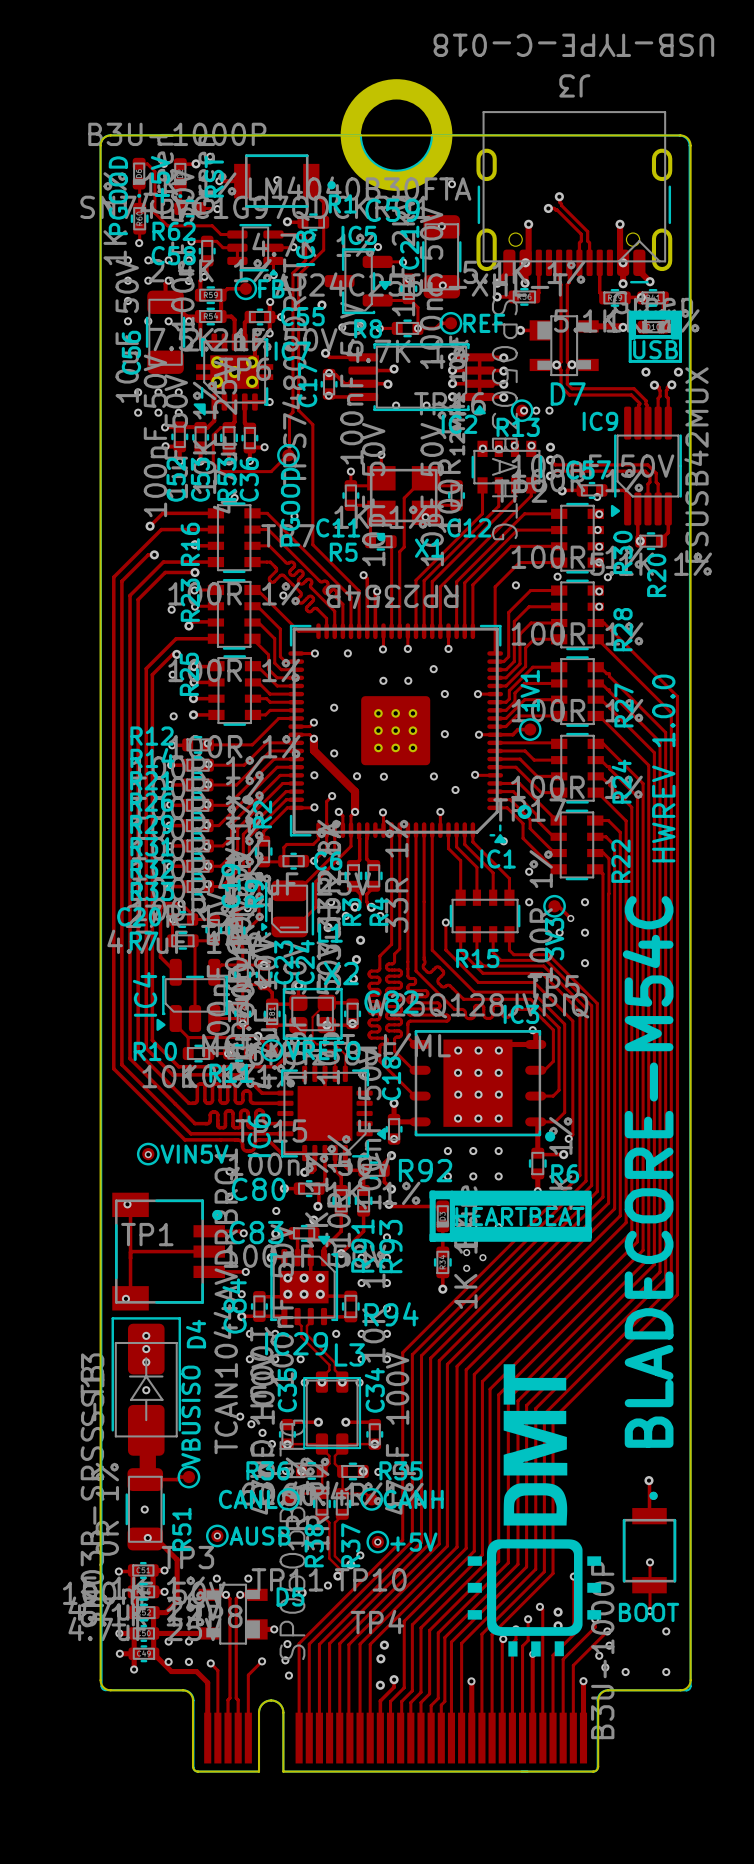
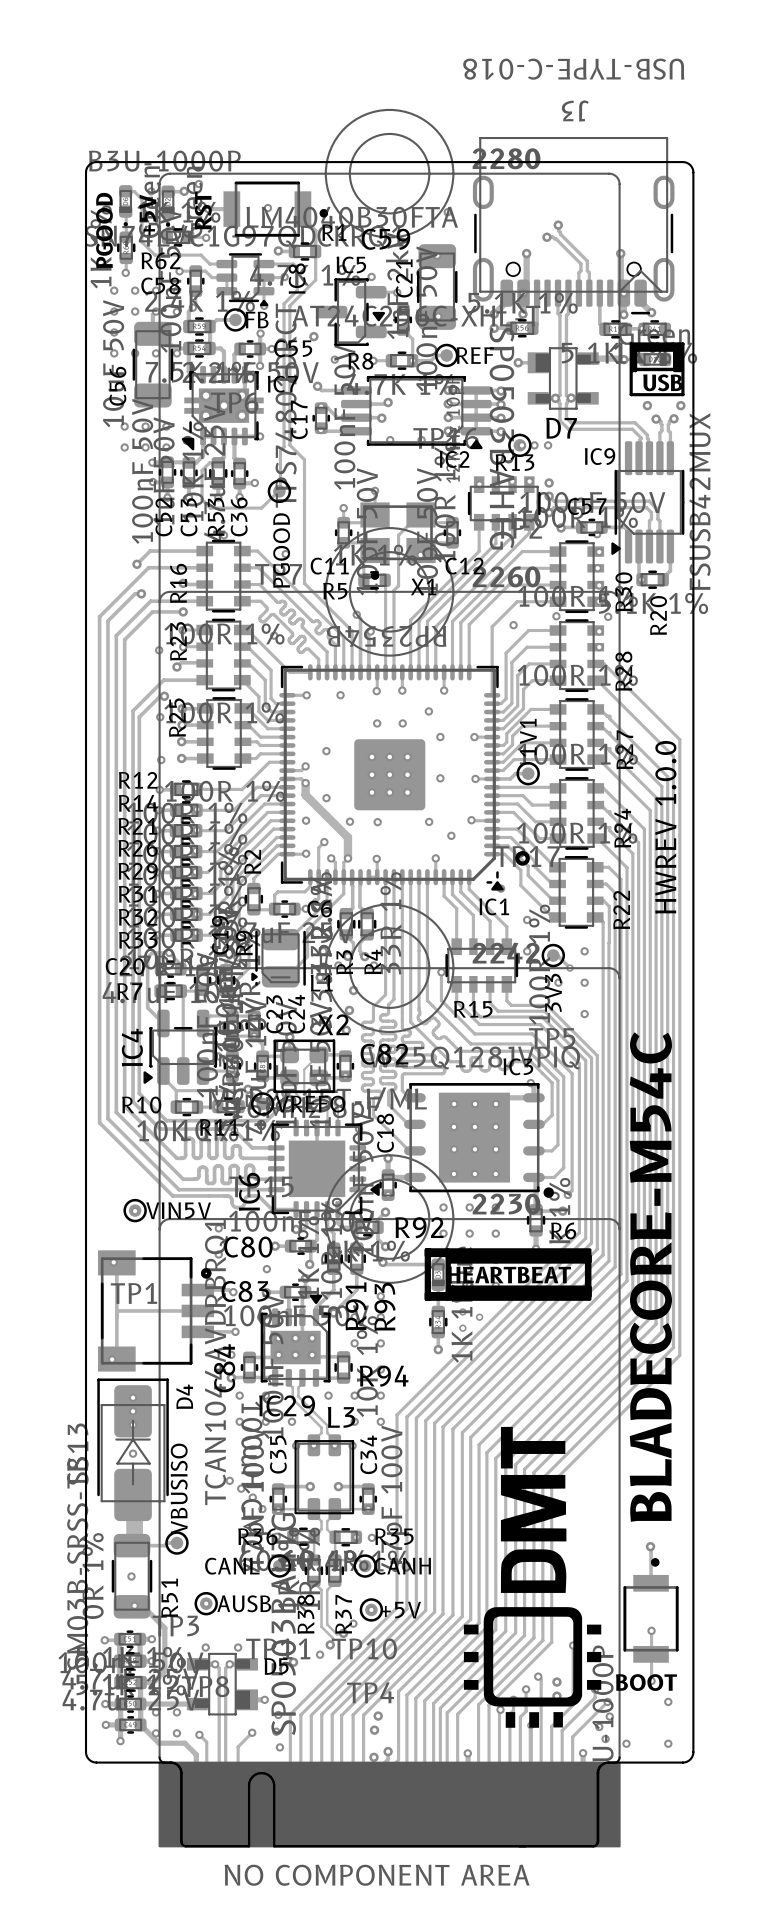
part footprint: [99, 79, 692, 1773] -> [158, 108, 621, 1848]

